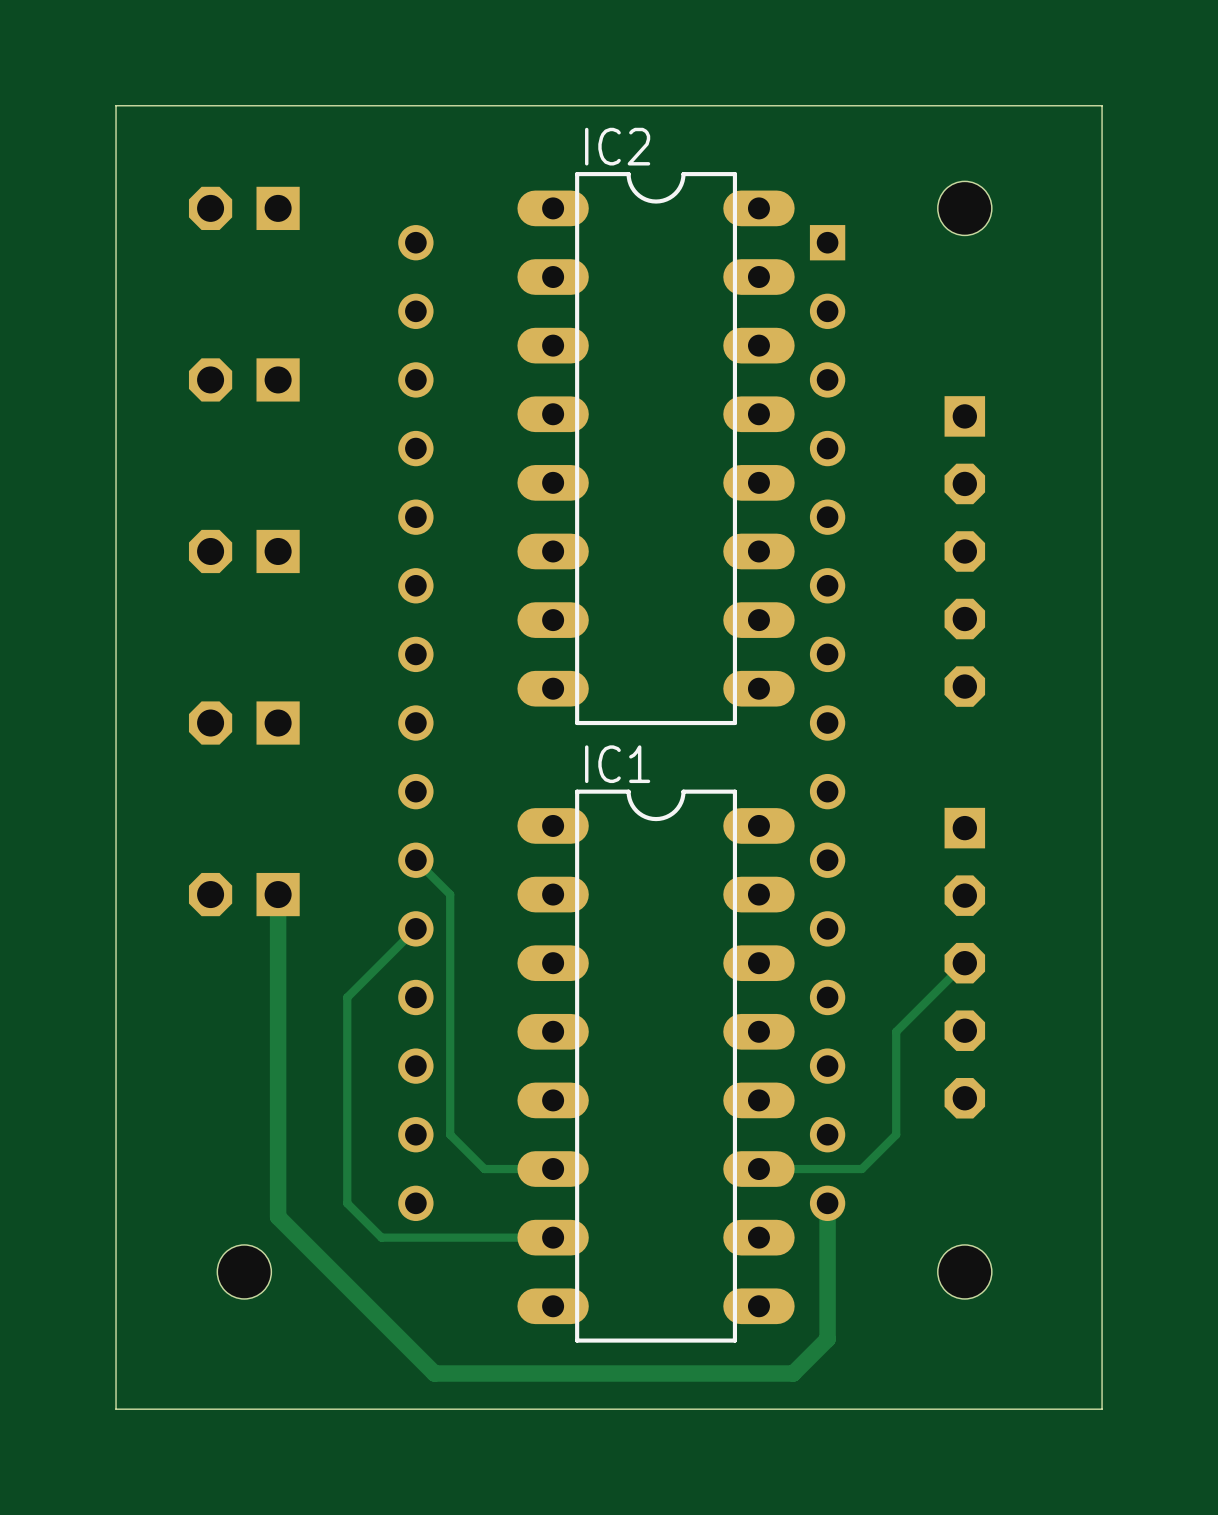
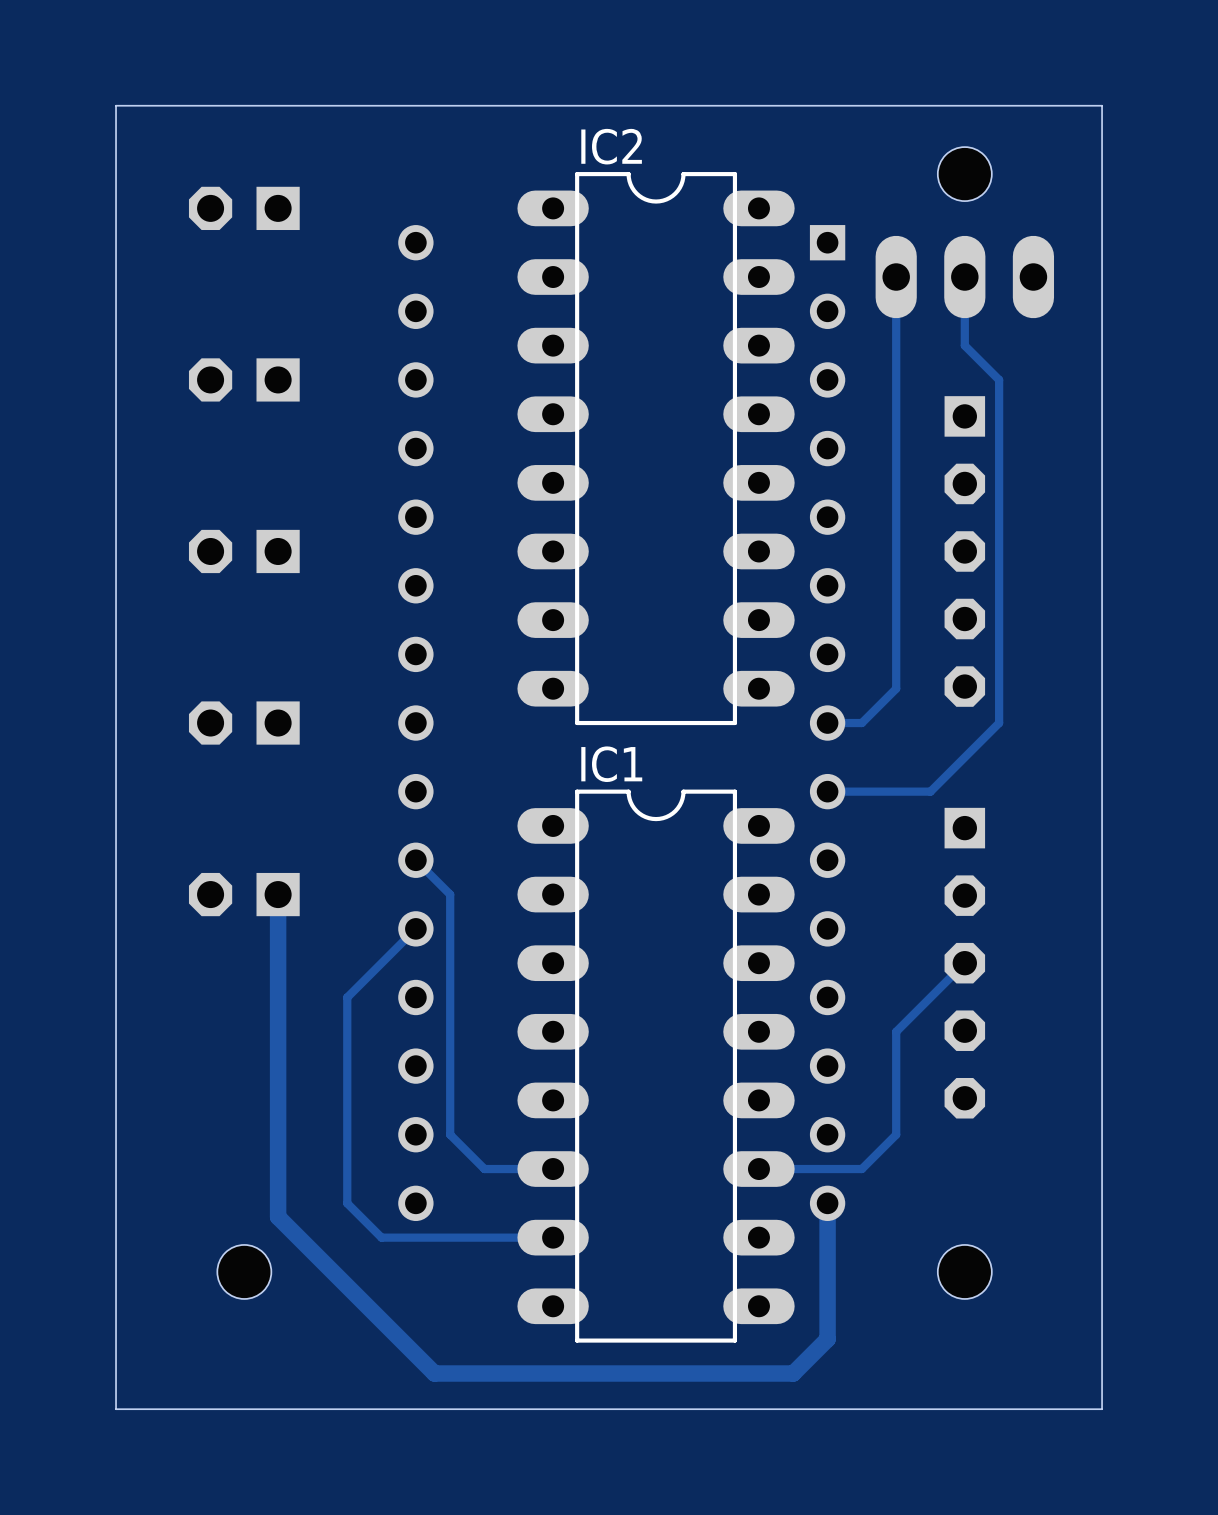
hole position: (964, 208) -> (964, 174)
track: none -> (896, 277) (896, 688) (861, 723) (827, 723)
track: none -> (964, 277) (964, 345) (999, 379) (999, 723) (930, 791) (827, 791)
part: none -> (964, 277)

